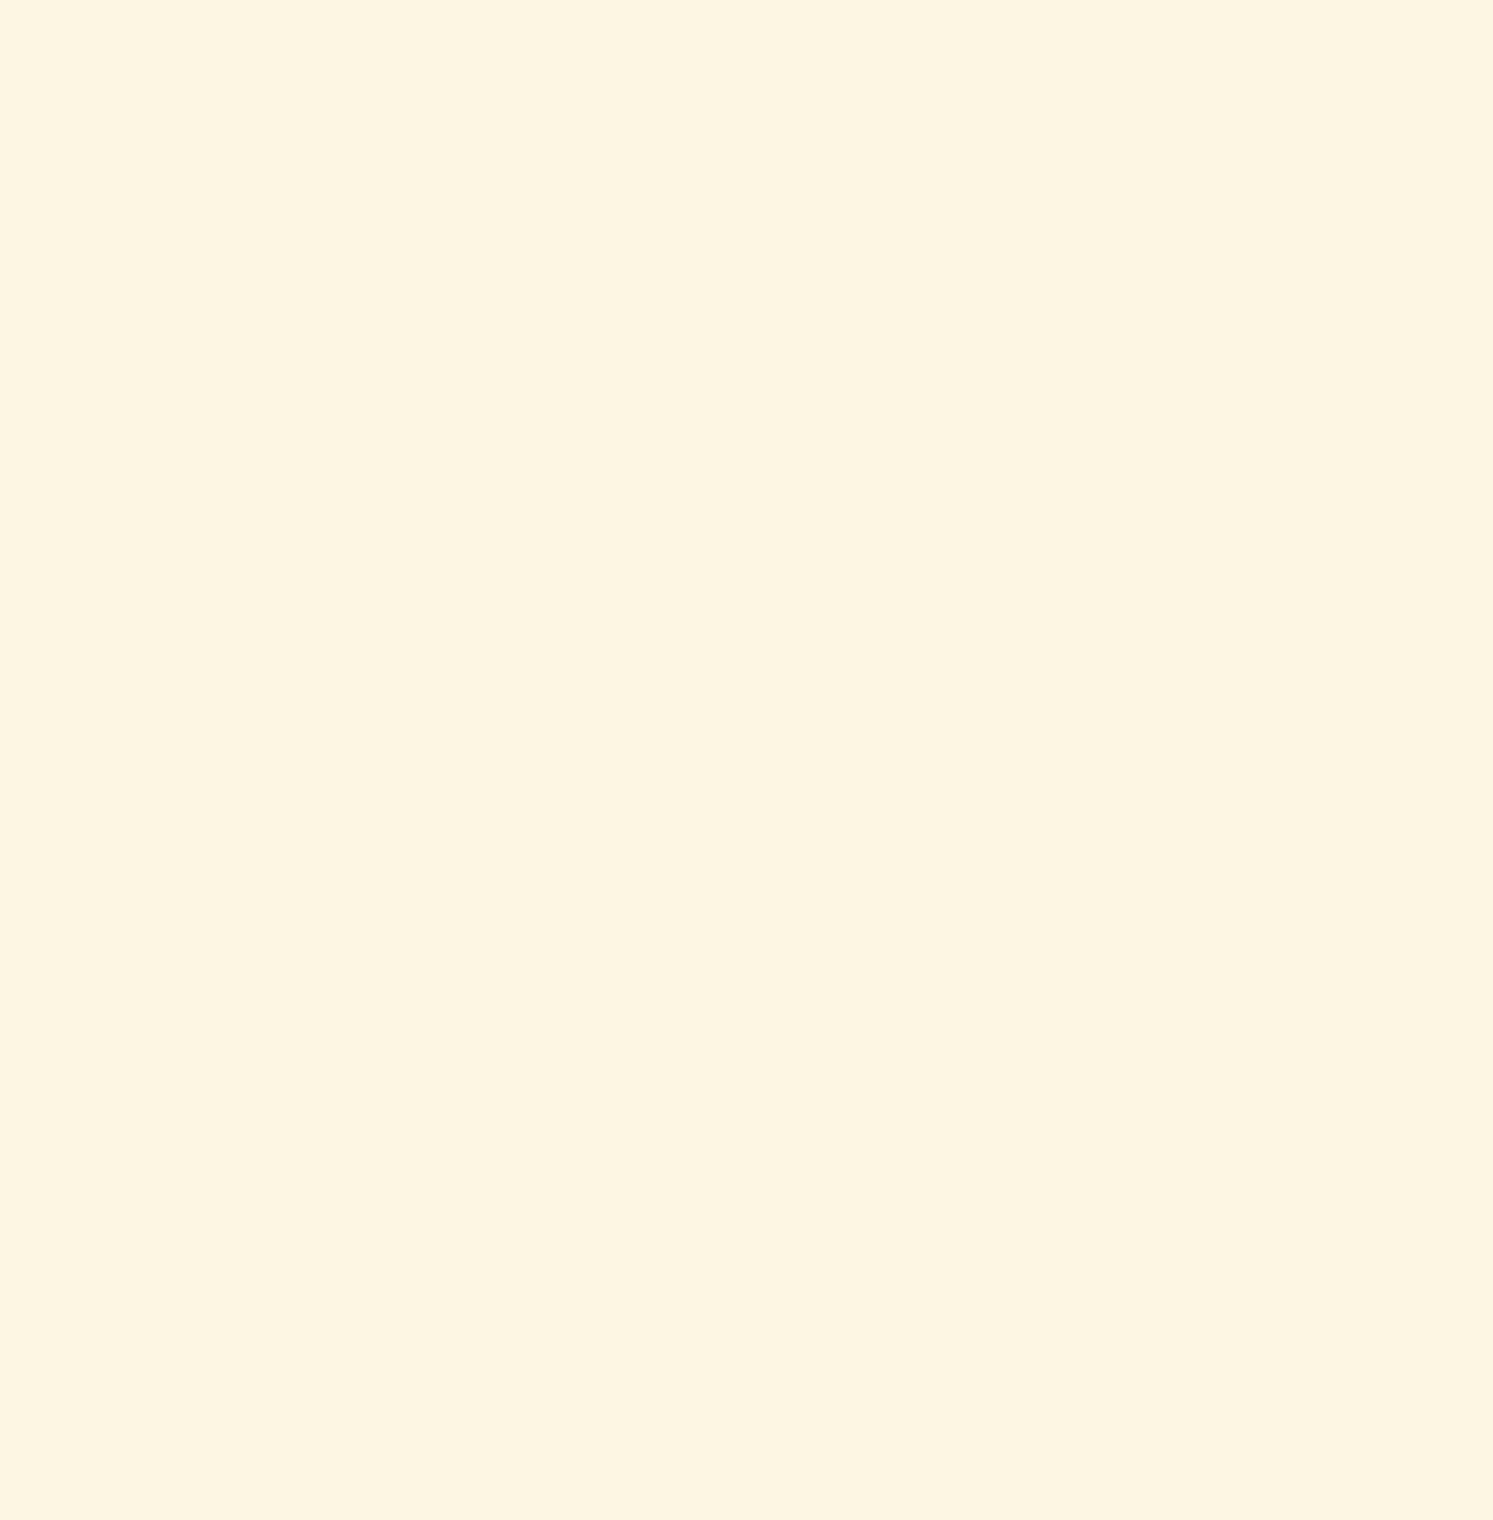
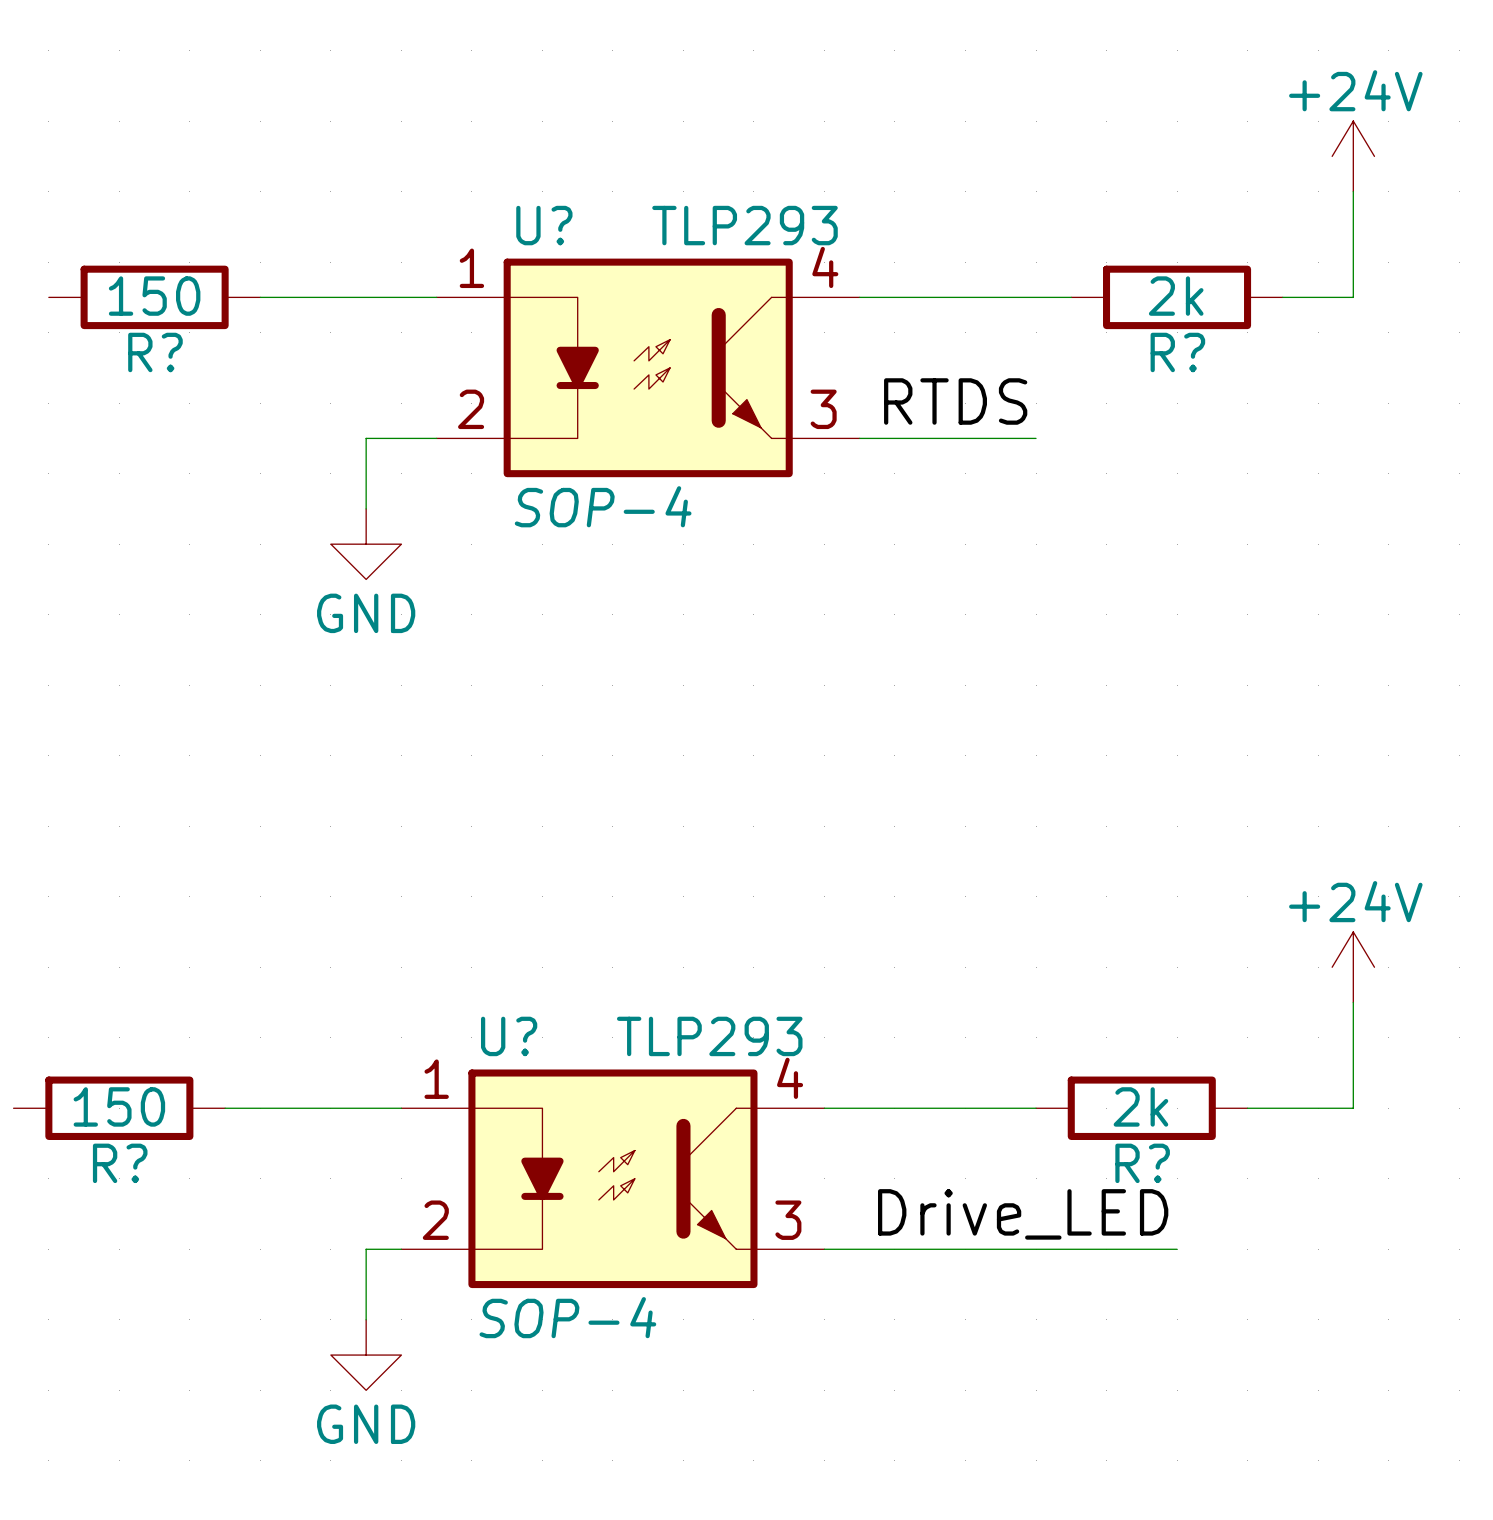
power symbol: none -> +24V (1353, 156)
wire: none -> (1353, 191) (1353, 297) (1282, 297)
R?: none -> 150 (154, 297)
wire: none -> (260, 297) (436, 297)
wire: none -> (859, 297) (1071, 297)
R?: none -> 2k (1177, 297)
U?: none -> TLP293 (648, 367)
label: none -> RTDS (955, 401)
wire: none -> (436, 438) (366, 438) (366, 508)
wire: none -> (859, 438) (1036, 438)
power symbol: none -> GND (366, 544)
power symbol: none -> +24V (1353, 967)
wire: none -> (1353, 1002) (1353, 1108) (1247, 1108)
R?: none -> 150 (119, 1108)
wire: none -> (225, 1108) (401, 1108)
wire: none -> (824, 1108) (1036, 1108)
R?: none -> 2k (1141, 1108)
U?: none -> TLP293 (612, 1178)
label: none -> Drive_LED (1023, 1214)
wire: none -> (401, 1249) (366, 1249) (366, 1319)
wire: none -> (824, 1249) (1177, 1249)
power symbol: none -> GND (366, 1355)

